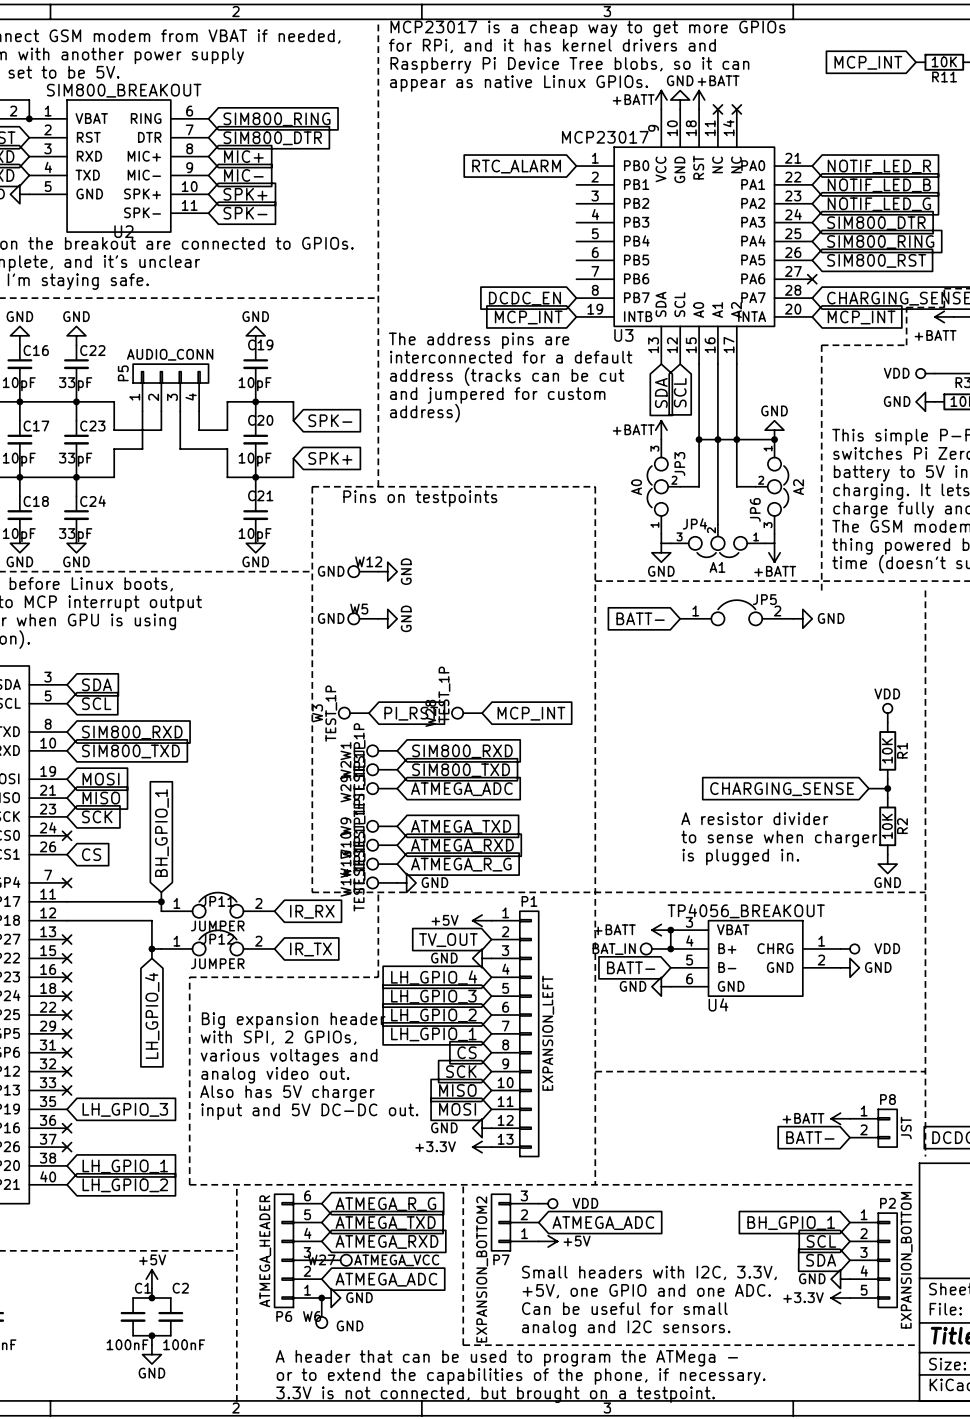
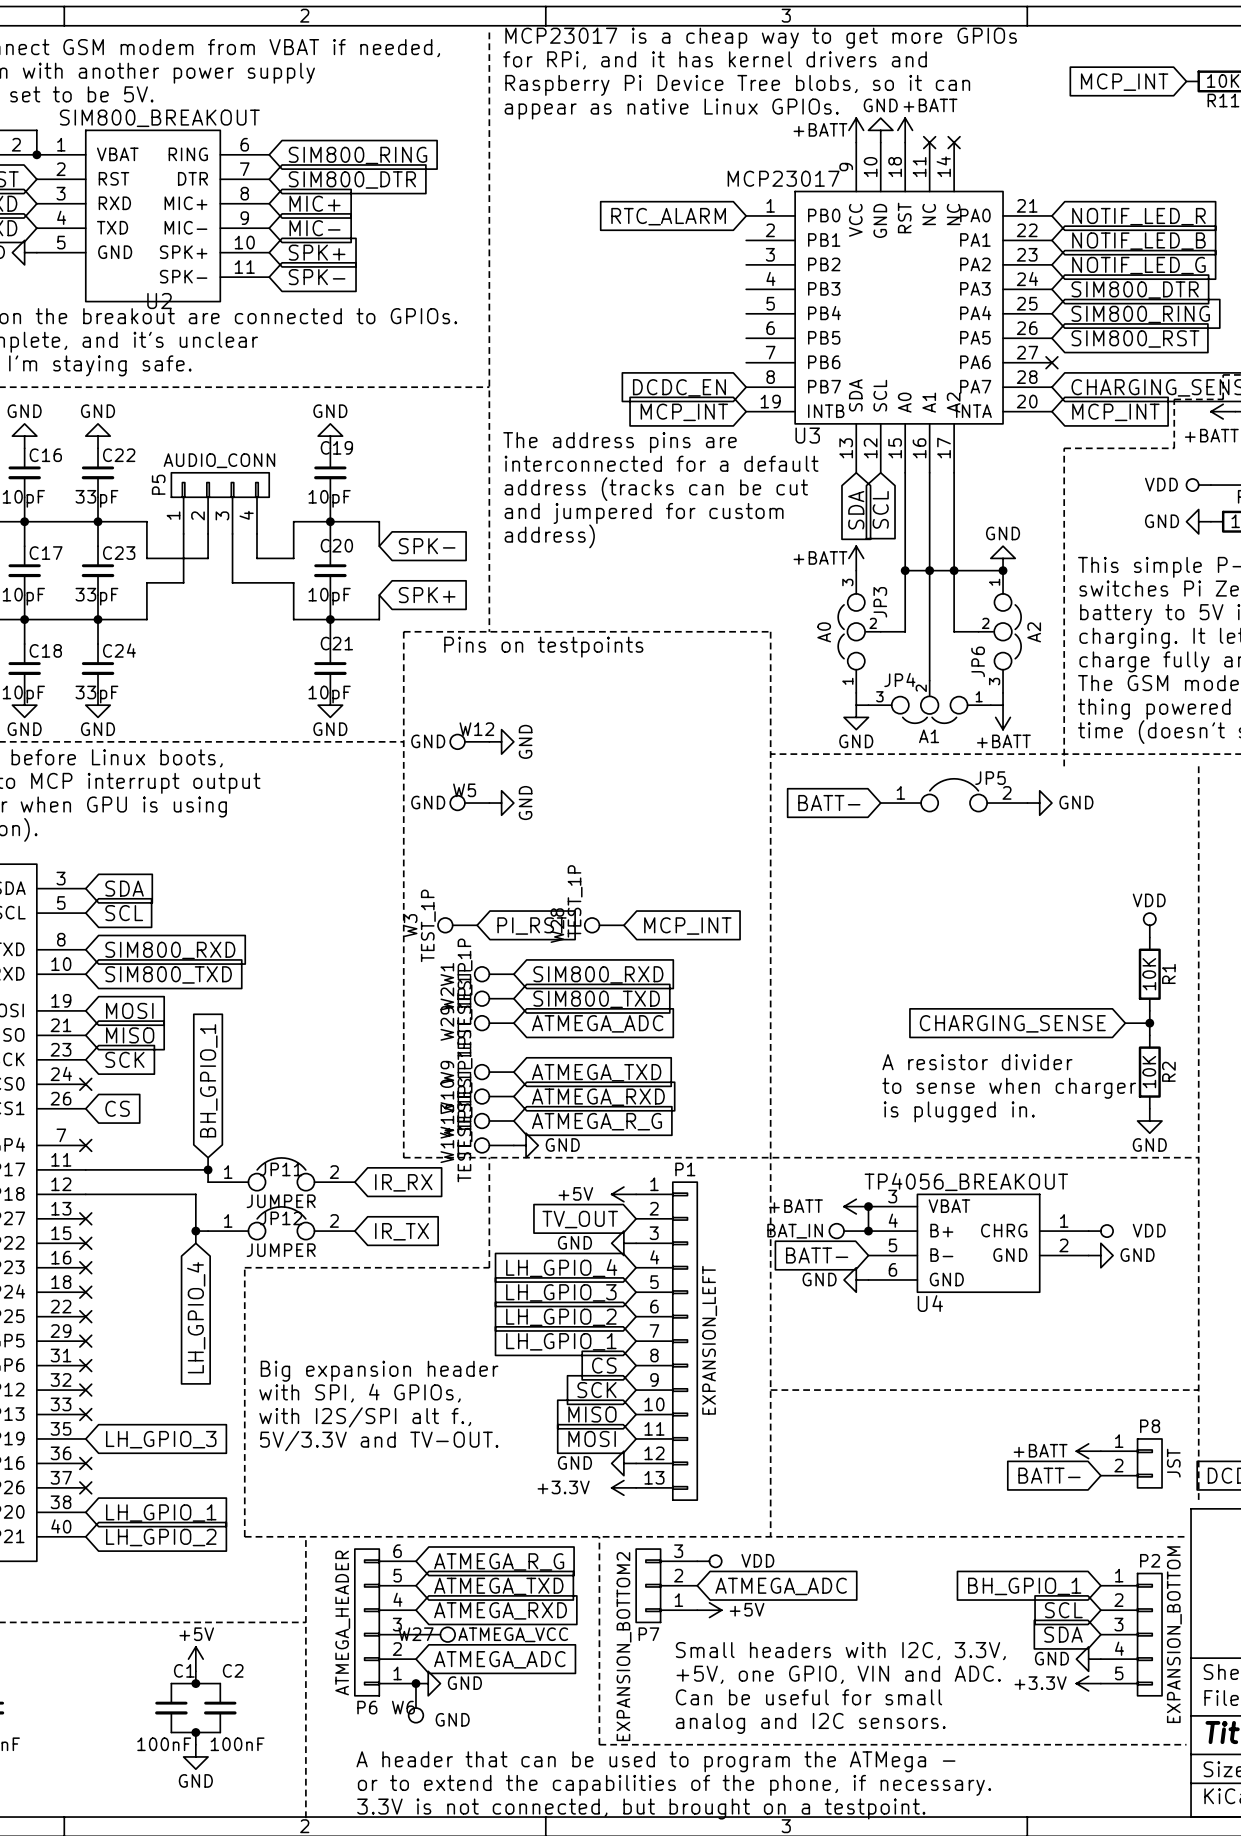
text: Big expansion header (293, 1020) -> none
text: with SPI, 2 GPIOs, (278, 1037) -> none
text: various voltages and (289, 1057) -> Big expansion header (379, 1371)
text: analog video out. (275, 1075) -> with SPI, 4 GPIOs, (359, 1393)
text: Also has 5V charger (287, 1093) -> with I2S/SPI alt f., (365, 1417)
text: input and 5V DC-DC out. (309, 1111) -> 5V/3.3V and TV-OUT. (379, 1441)
text: +5V, one GPIO and one ADC. (646, 1291) -> +5V, one GPIO, VIN and ADC. (838, 1674)

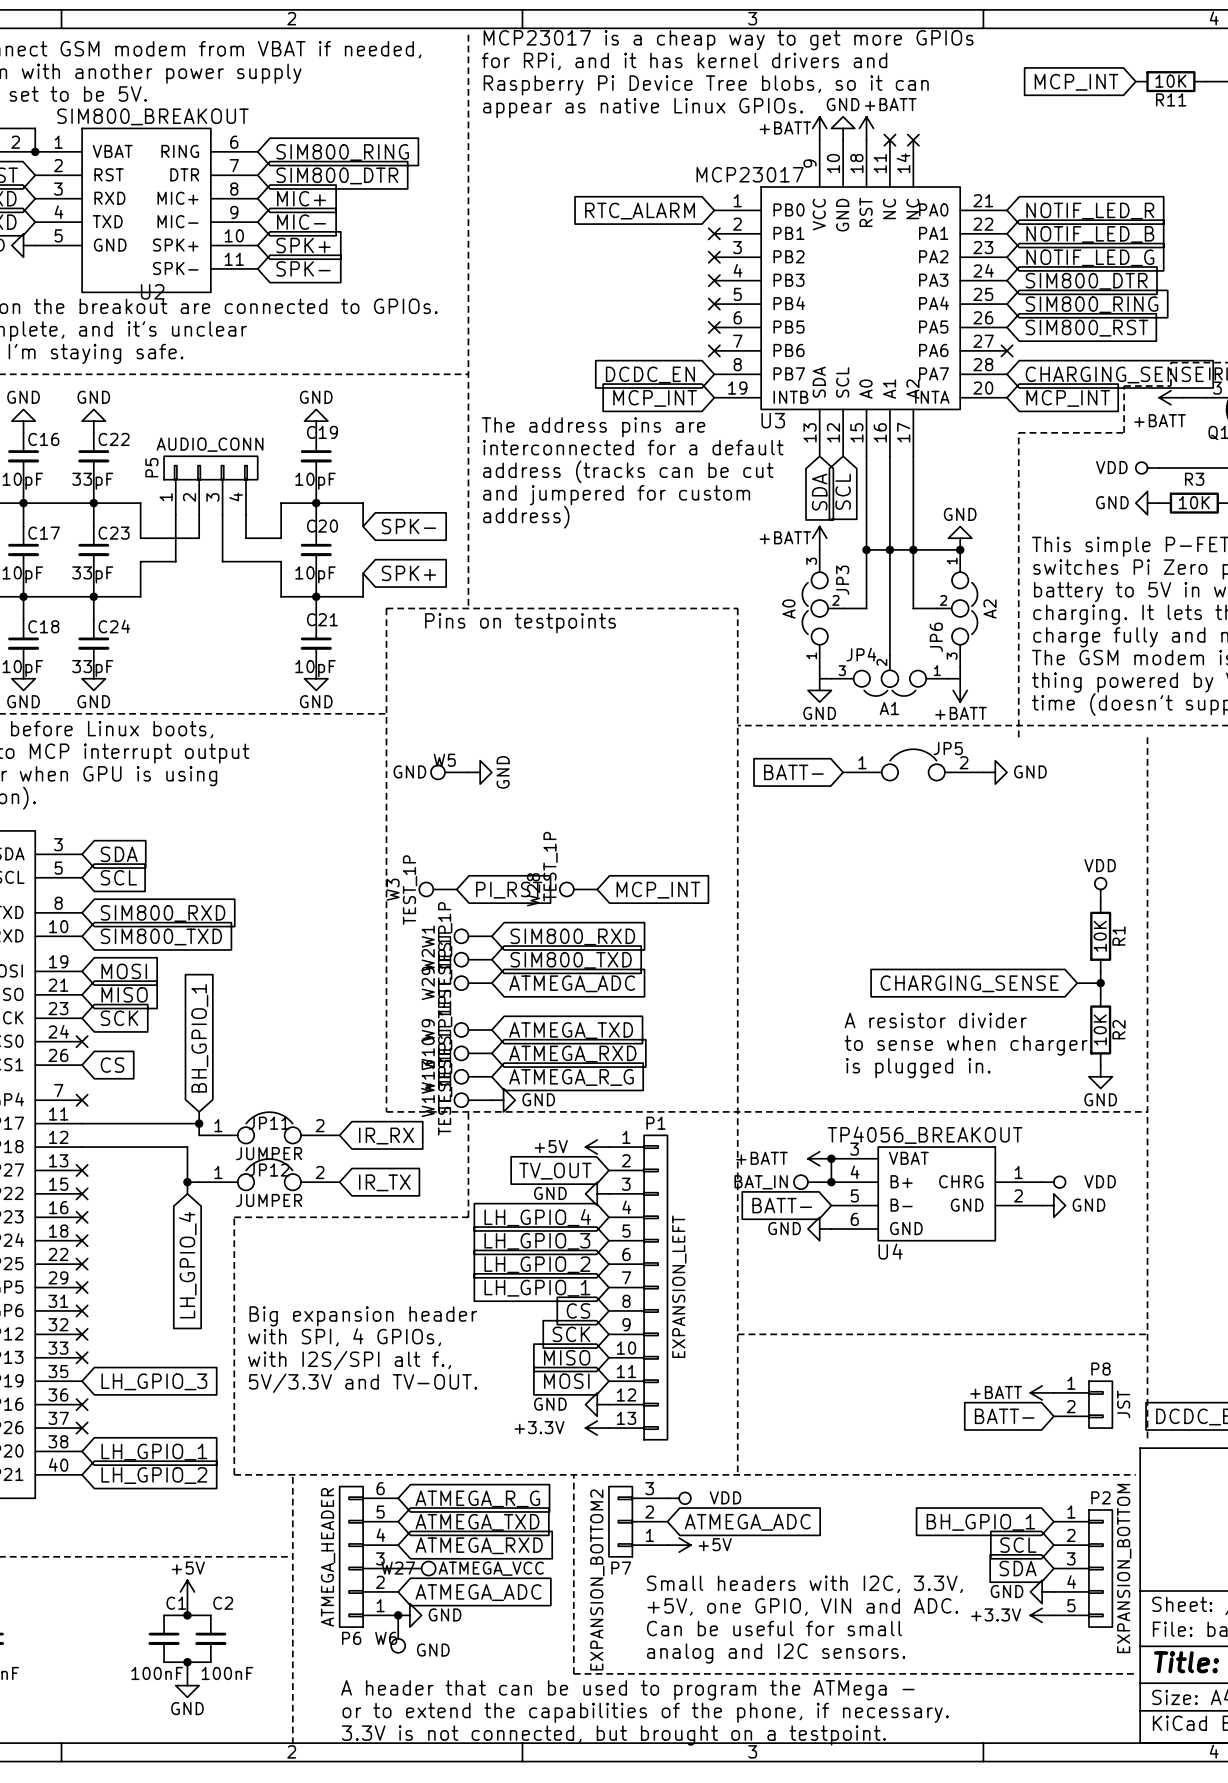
no-connect mark: none -> (714, 233)
no-connect mark: none -> (714, 257)
no-connect mark: none -> (714, 280)
no-connect mark: none -> (714, 304)
no-connect mark: none -> (714, 327)
no-connect mark: none -> (714, 350)
W12: GND (469, 741) -> none
power symbol: GND (501, 741) -> none

